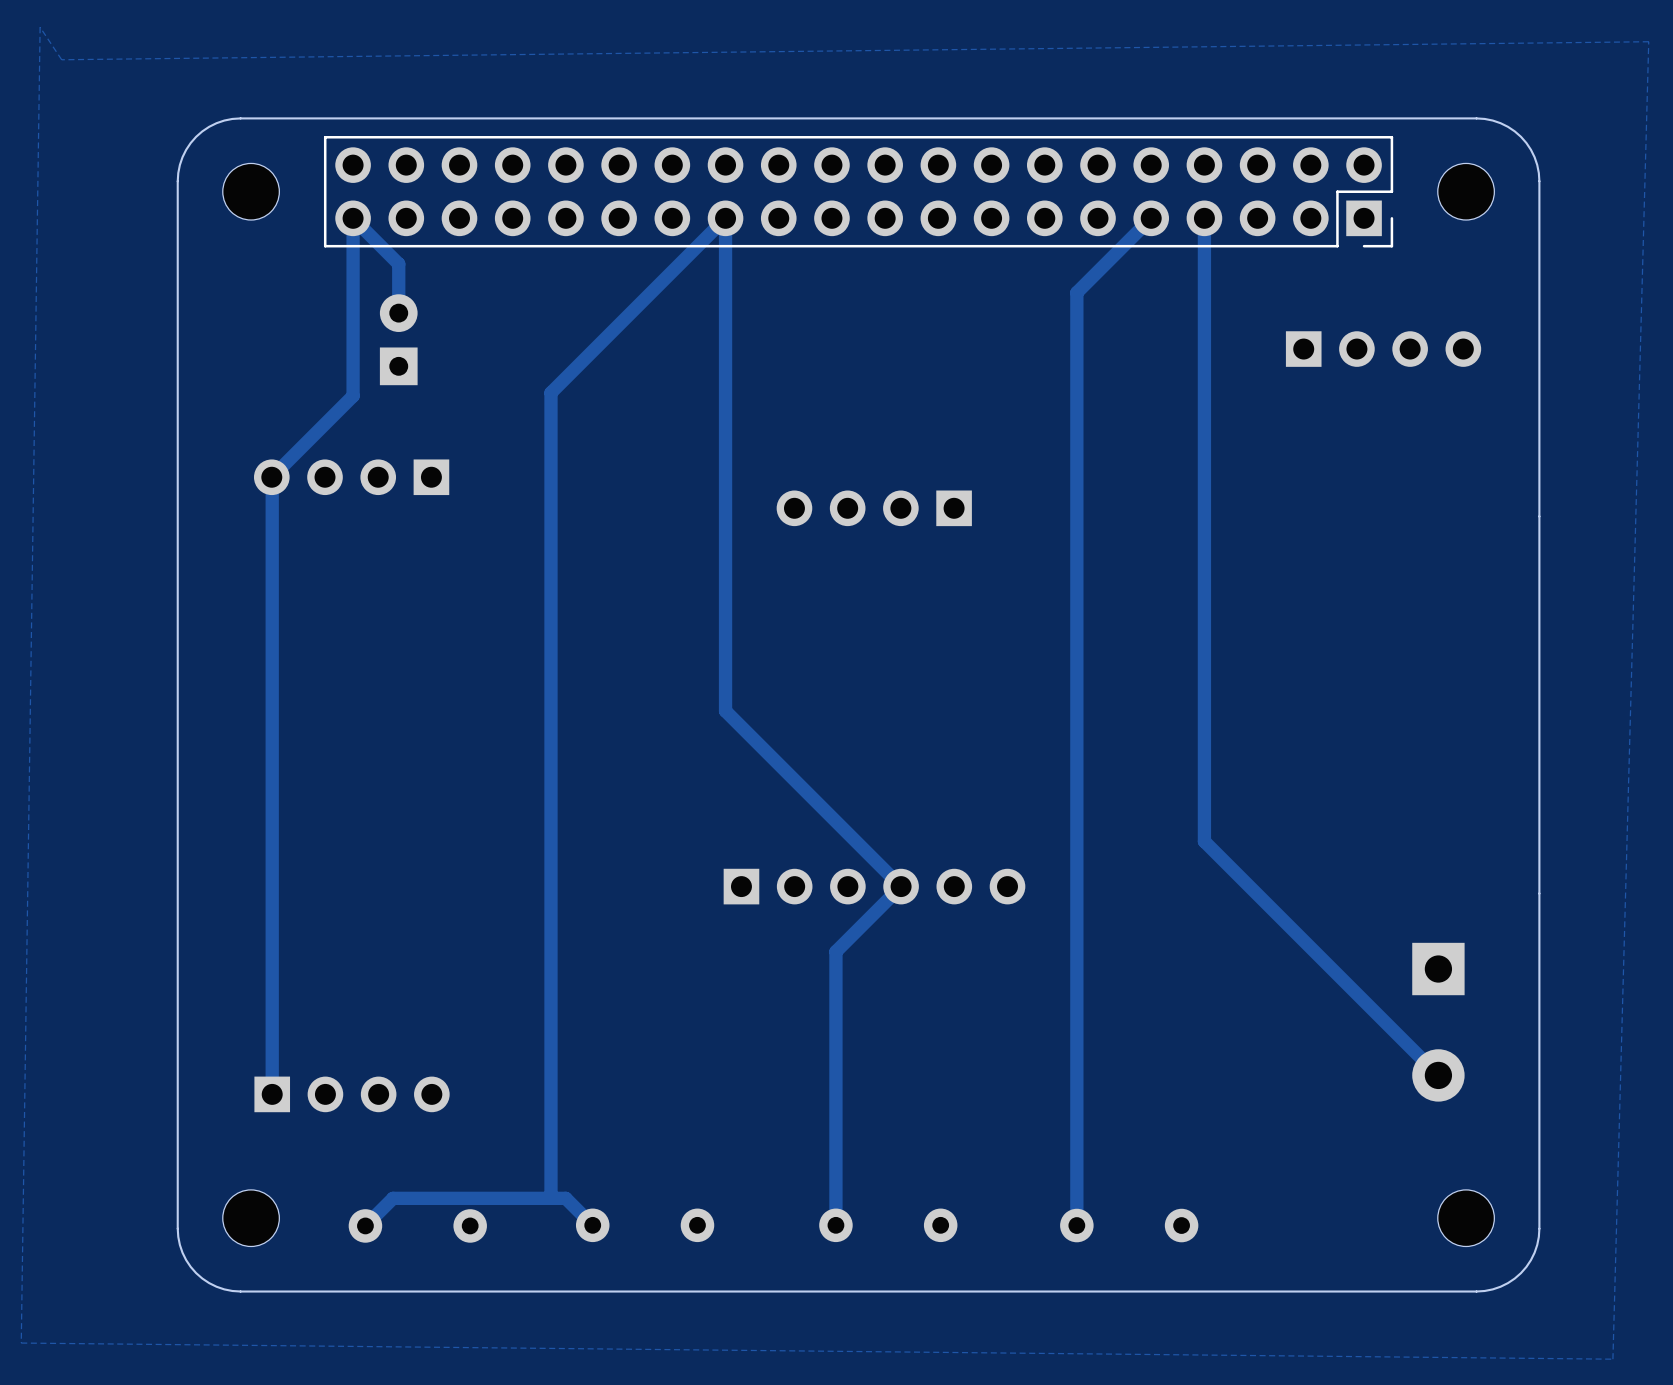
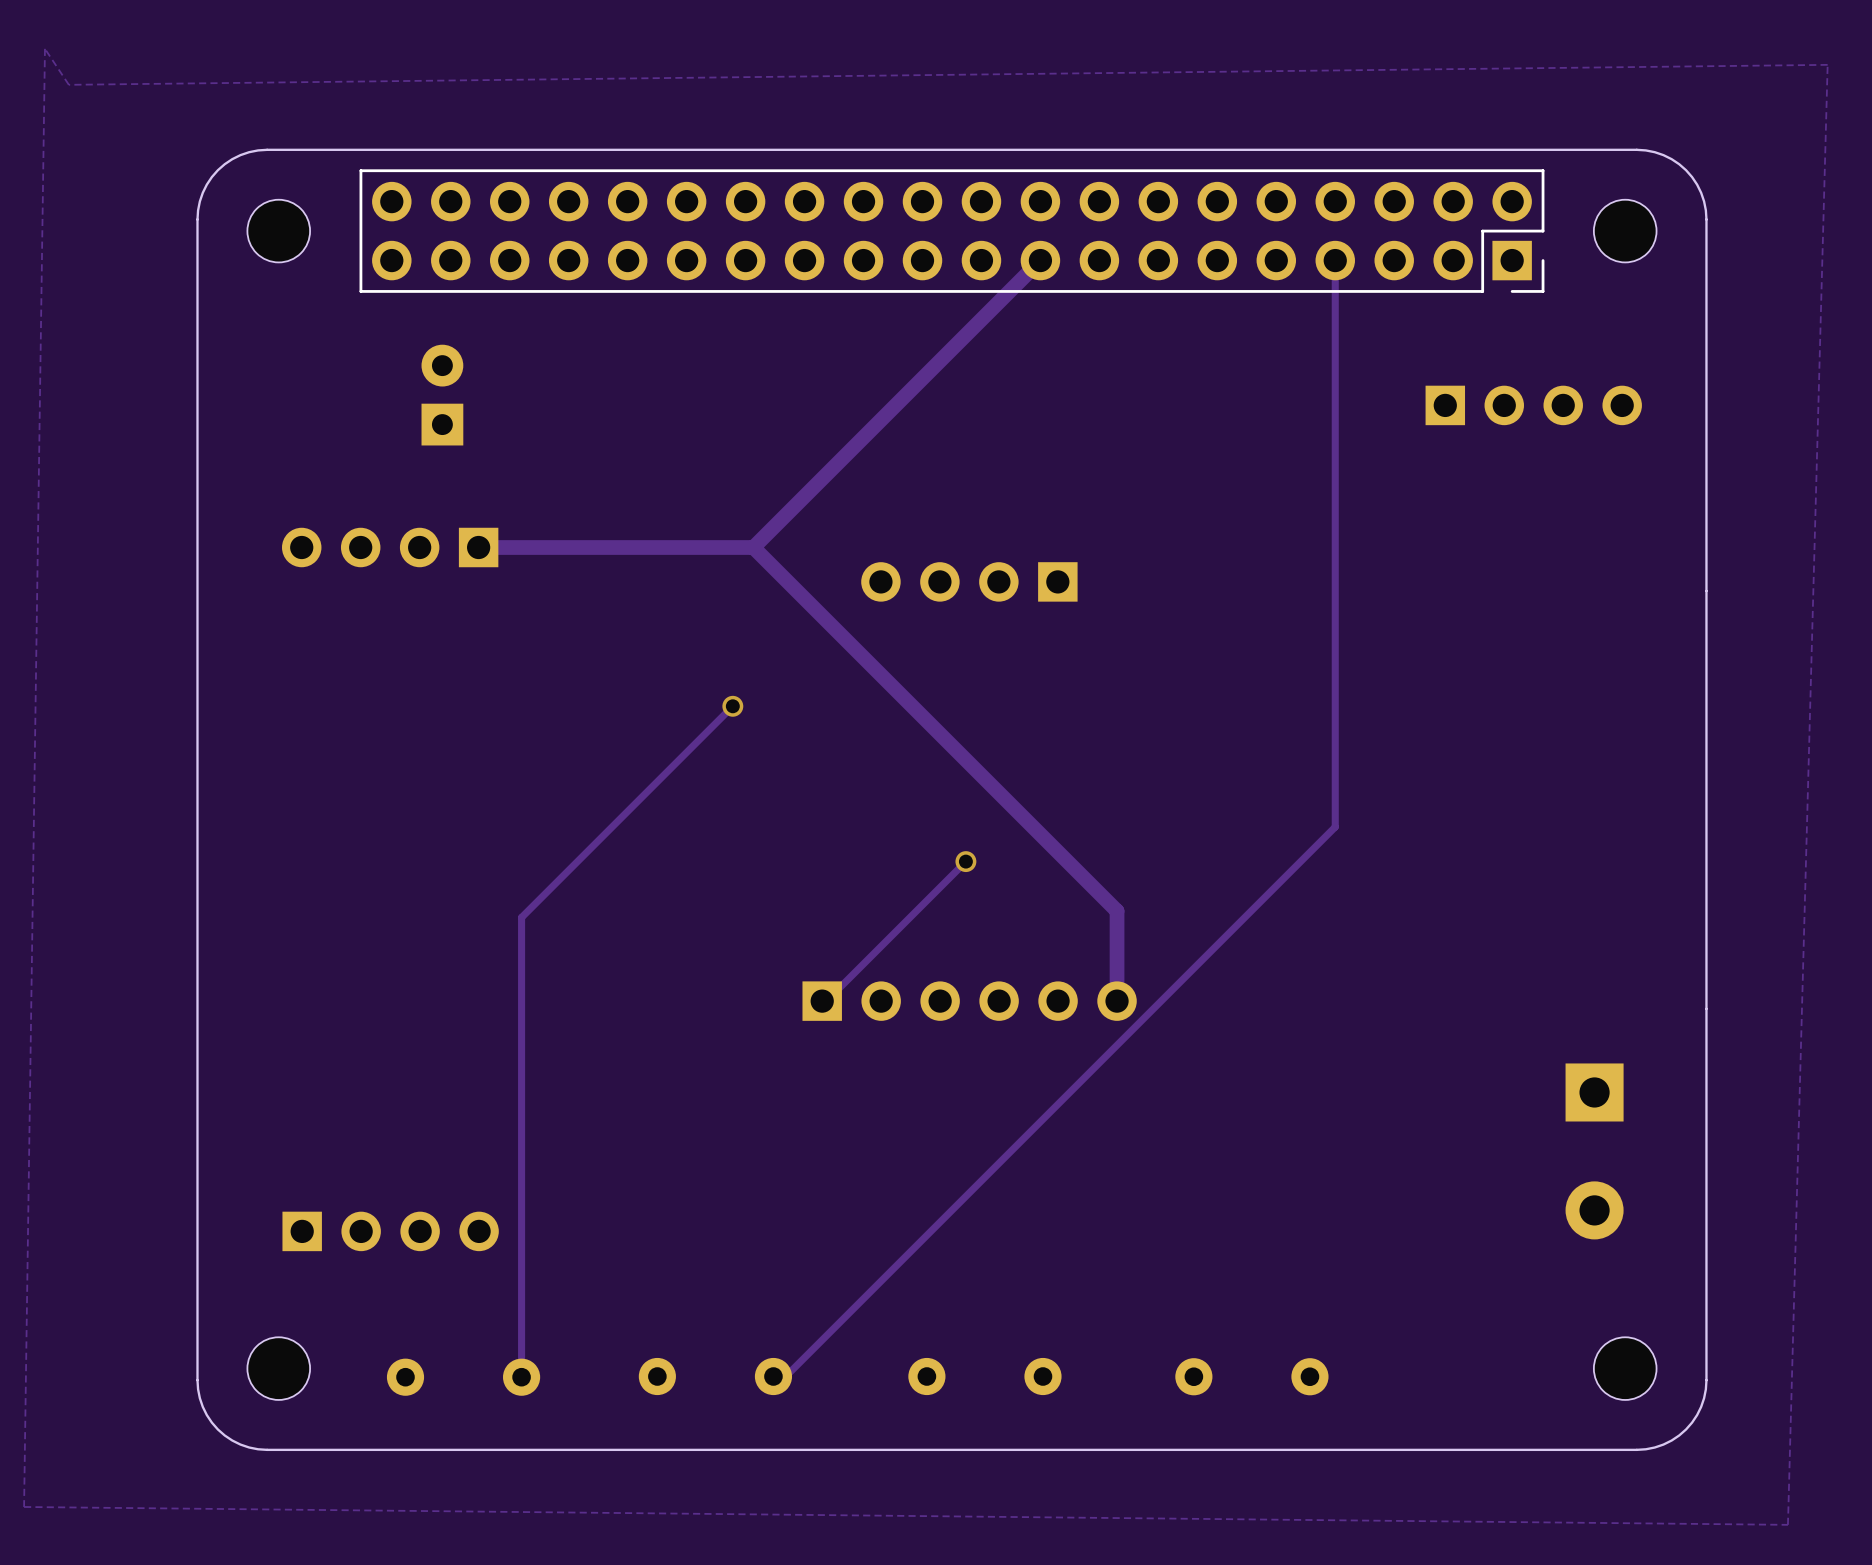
track: none -> (1040, 260) (753, 547)
track: (1151, 218) (1076, 292) (1076, 1225) -> none
track width: thick (1204, 218) (1204, 729) -> thin (1335, 260) (1335, 827)
track: (398, 313) (398, 264) (353, 218) (353, 395) (271, 477) (272, 1094) -> none
track: none -> (753, 547) (478, 547)
track: none -> (753, 547) (1117, 911) (1117, 1001)
track: none -> (732, 706) (521, 917) (521, 1377)
via: none -> (732, 706)
track: (1204, 729) (1204, 841) (1438, 1075) -> (1335, 827) (785, 1376) (773, 1376)
track: none -> (965, 861) (826, 1001) (822, 1001)
via: none -> (965, 861)
track: (550, 1198) (550, 392) (725, 218) (725, 711) (901, 886) (835, 951) (835, 1225) -> none
track: (592, 1225) (565, 1198) (393, 1198) (365, 1225) -> none

